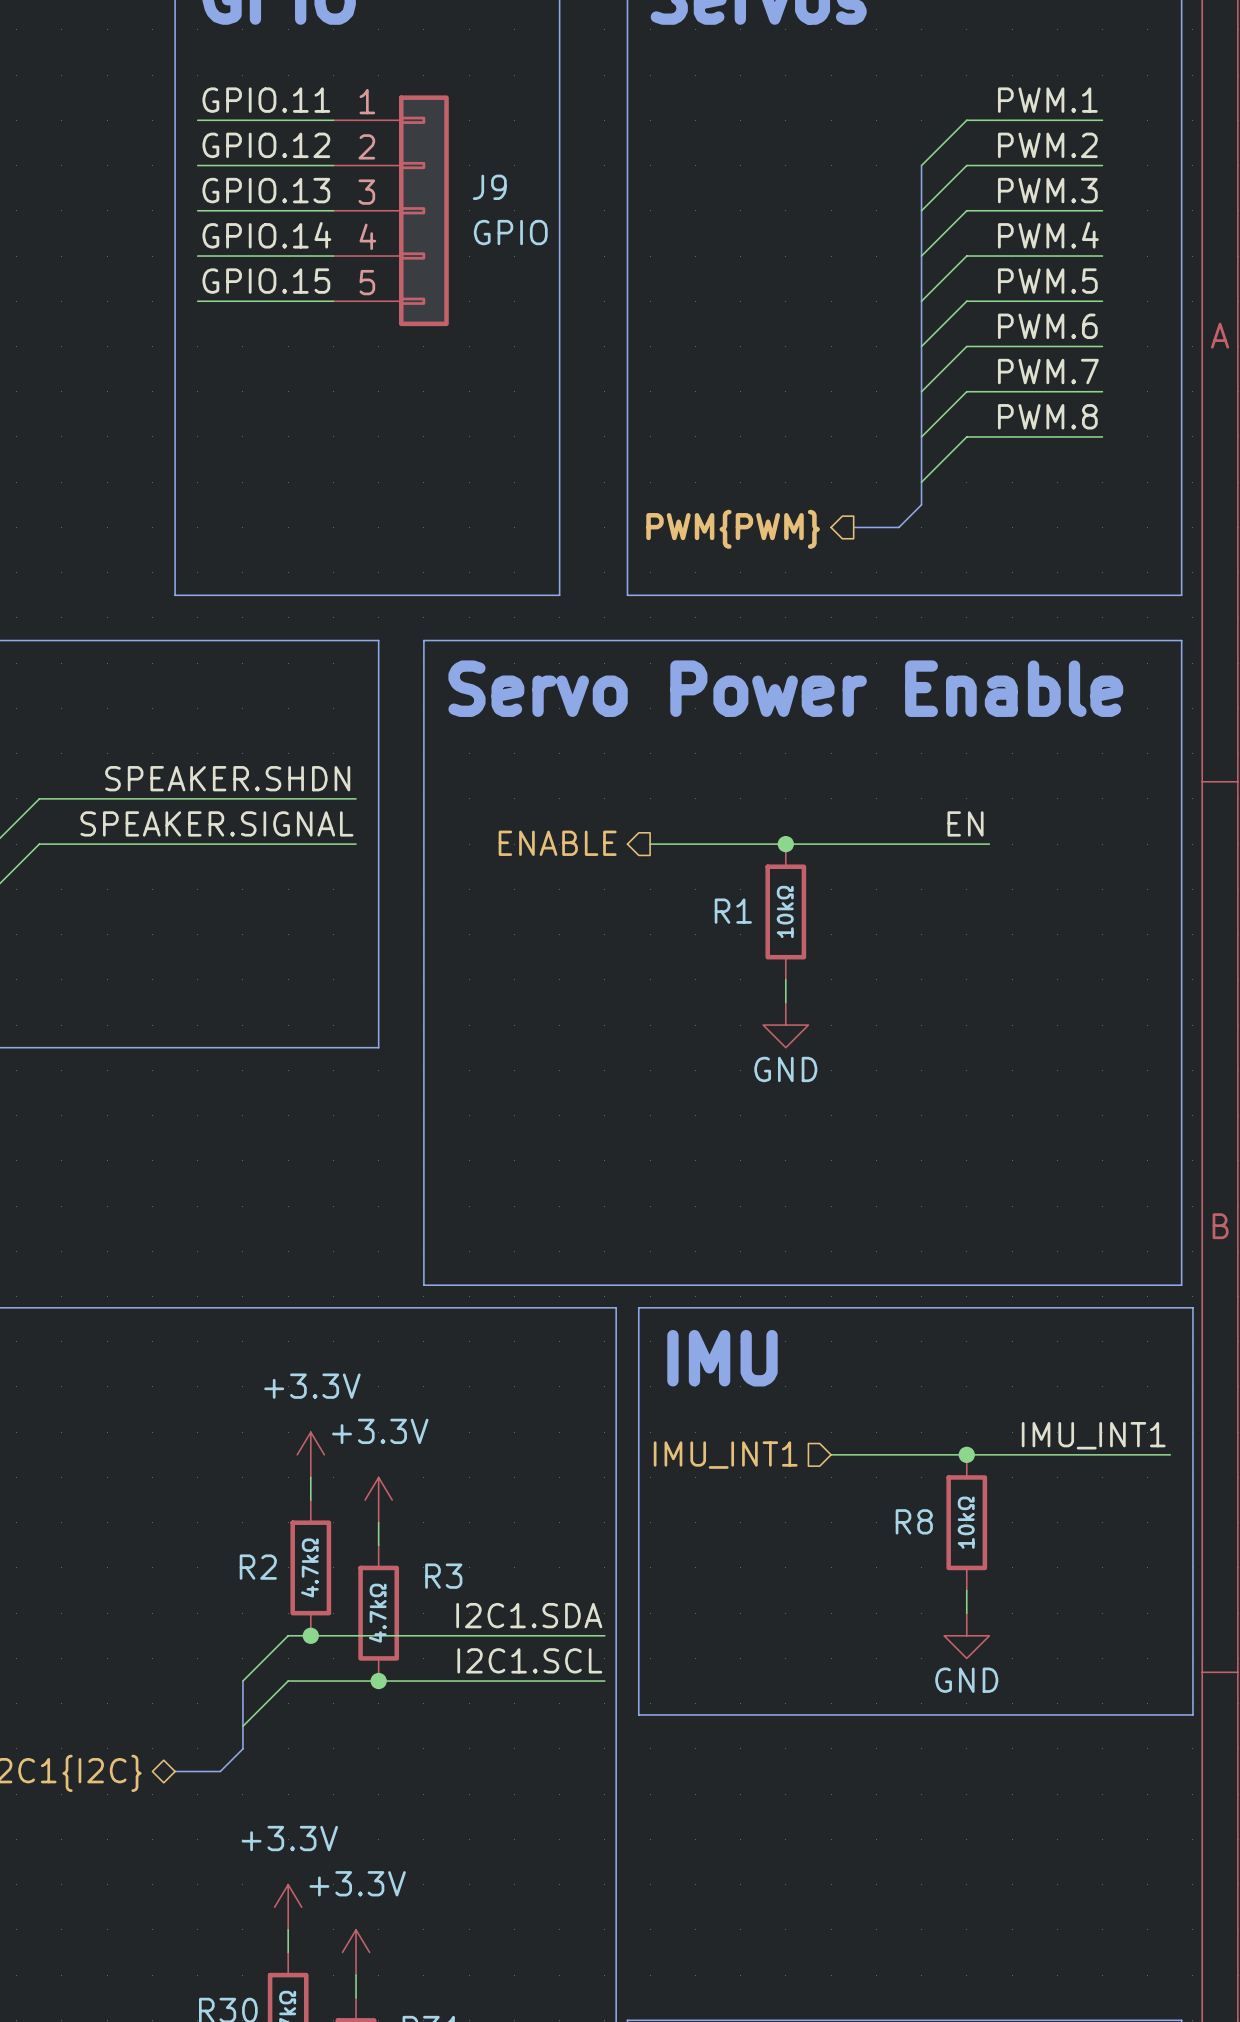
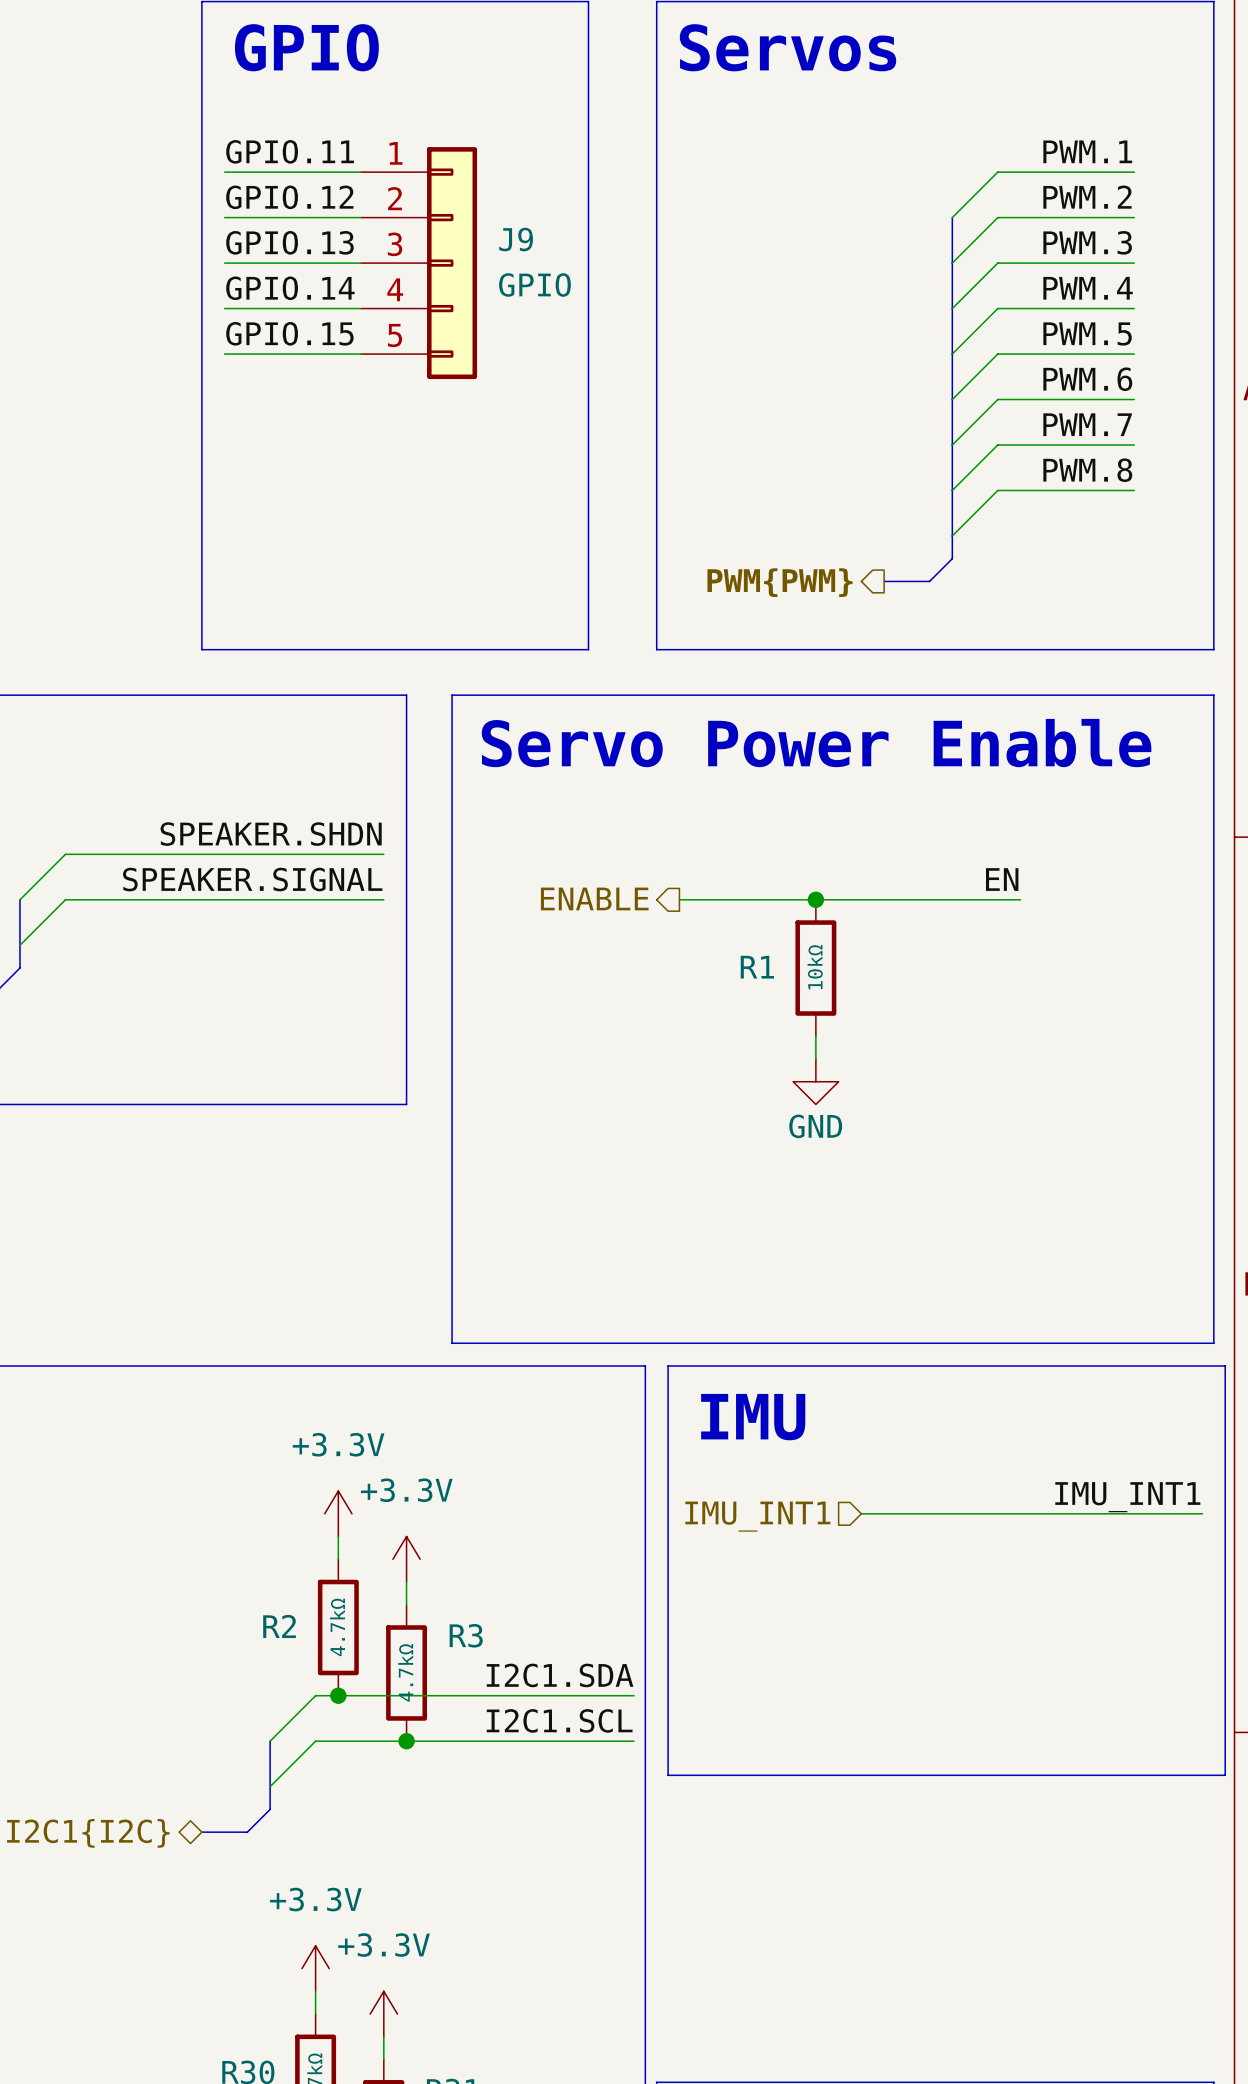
junction: (966, 1454) -> none
R8: 10kΩ (966, 1522) -> none
wire: (966, 1590) (966, 1613) -> none
power symbol: GND (966, 1635) -> none

